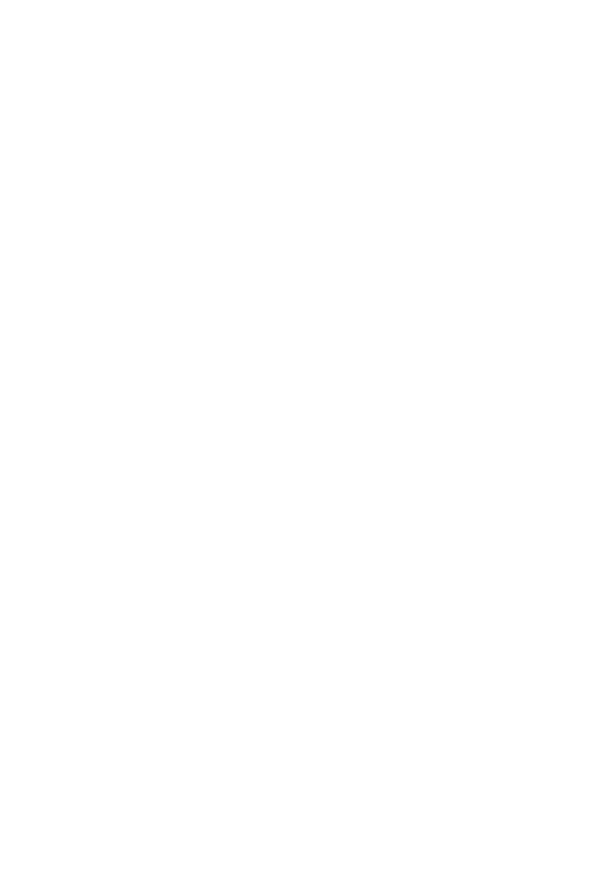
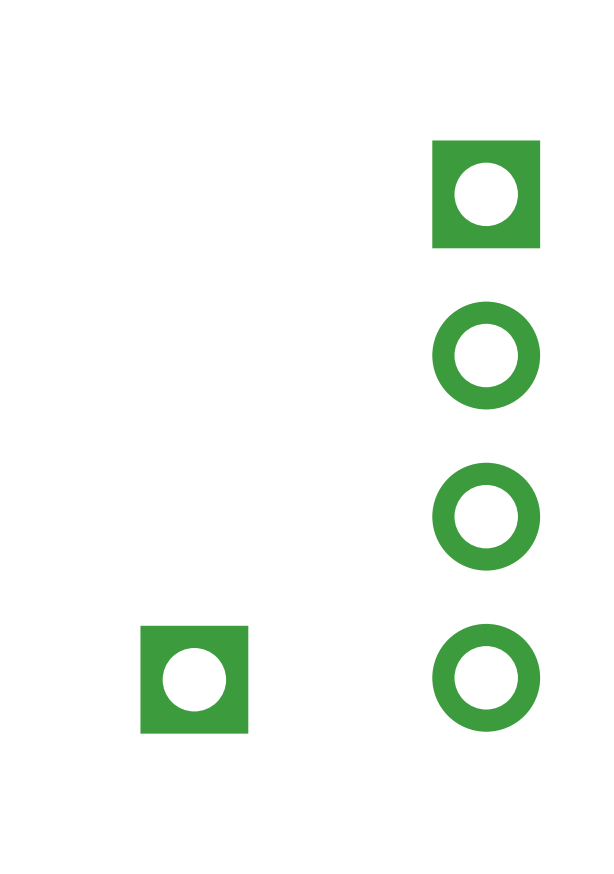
part: none -> (486, 436)
part: none -> (194, 679)

